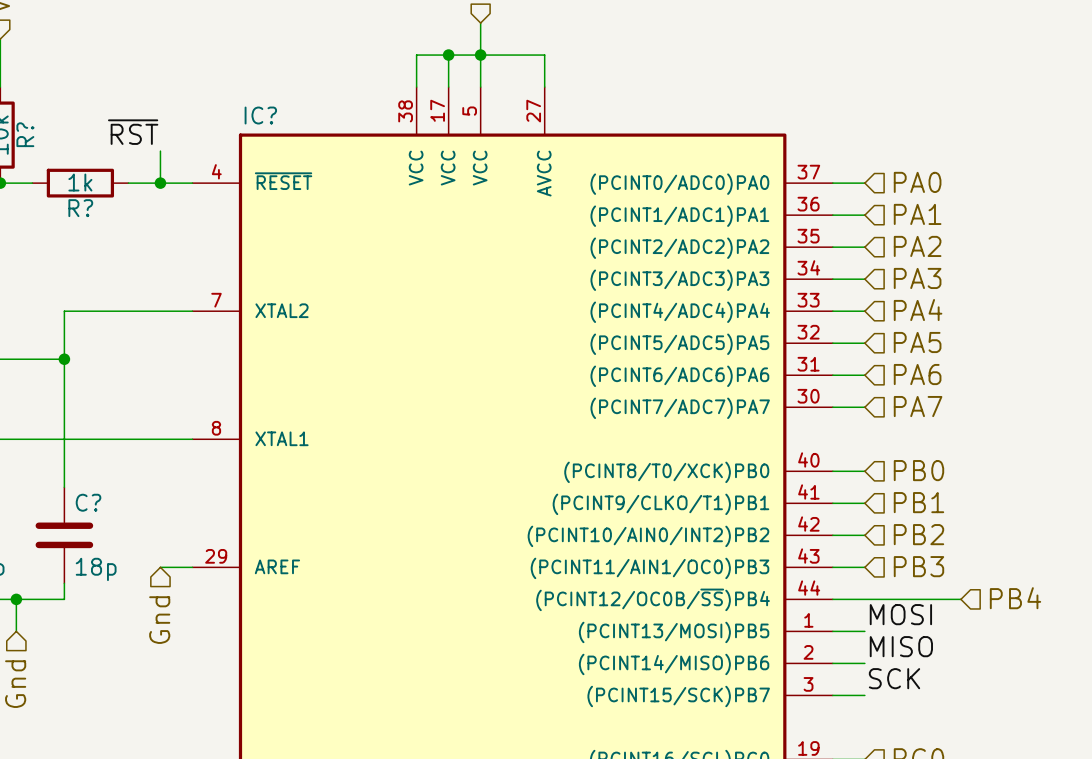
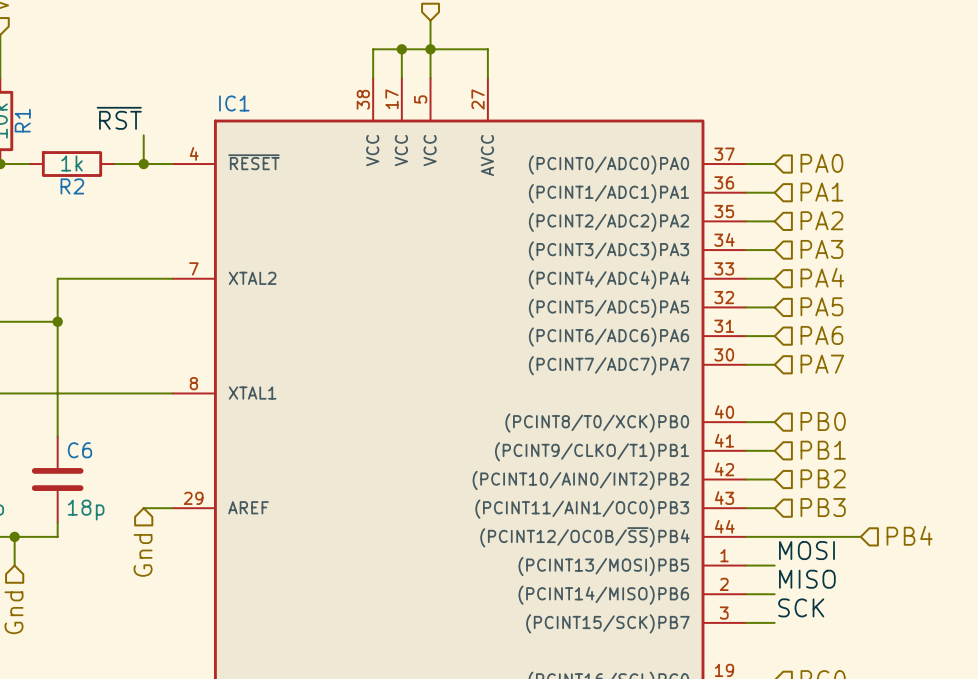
IC? name: IC? (260, 115) -> IC1 (234, 103)
R? name: R? (25, 134) -> R1 (22, 120)
R? name: R? (80, 208) -> R2 (72, 186)
C? name: C? (88, 502) -> C6 (79, 450)

